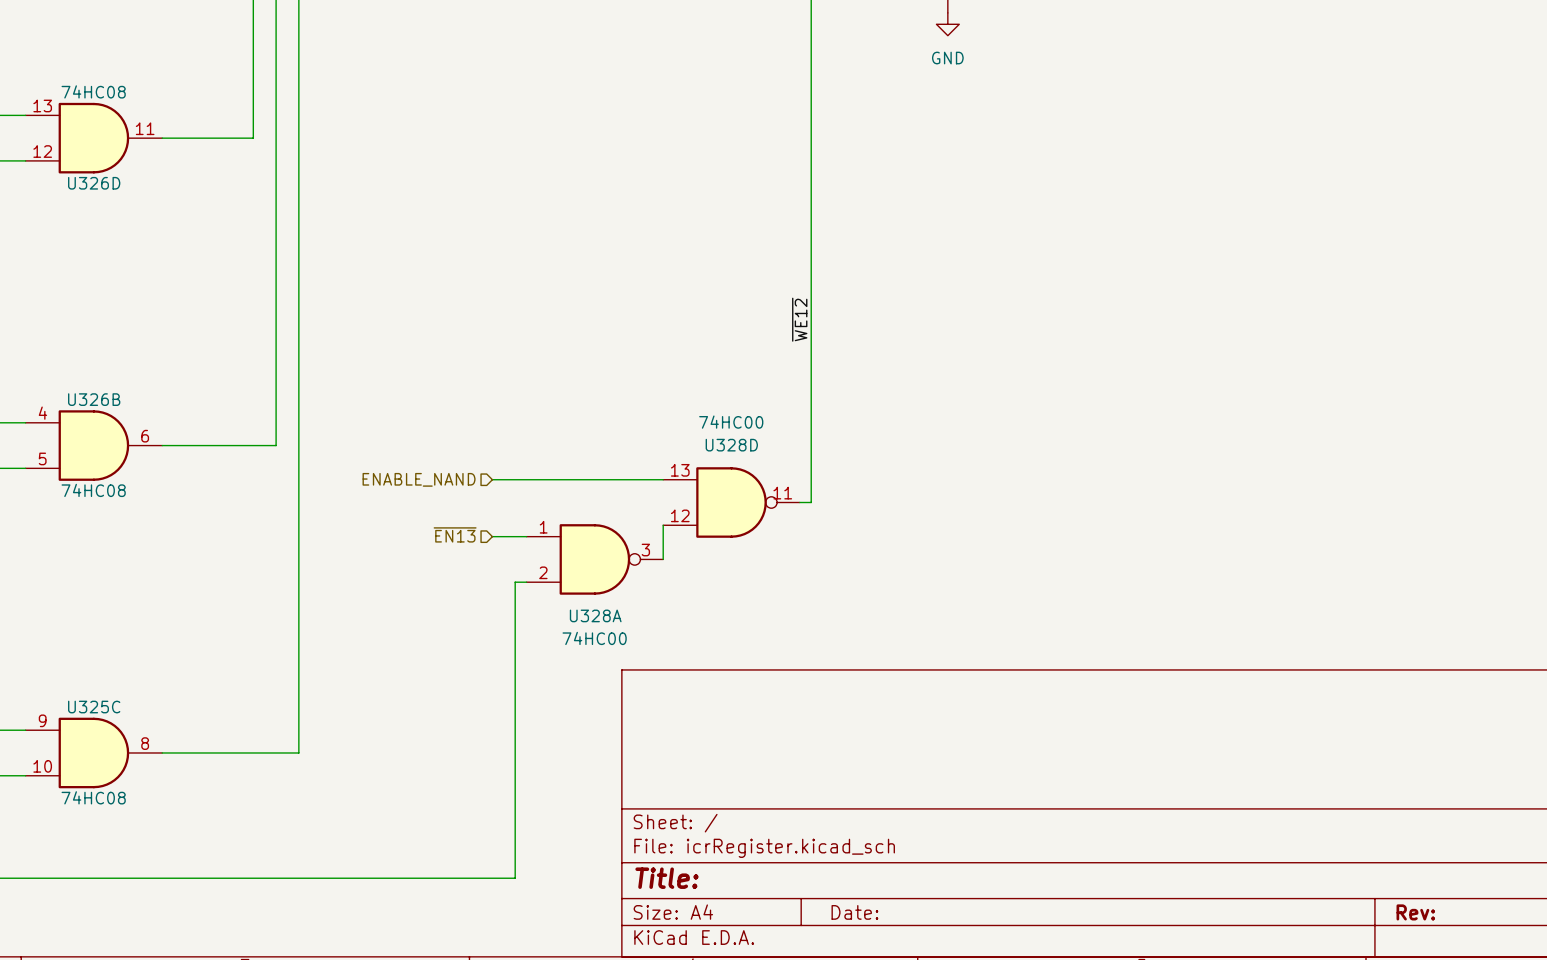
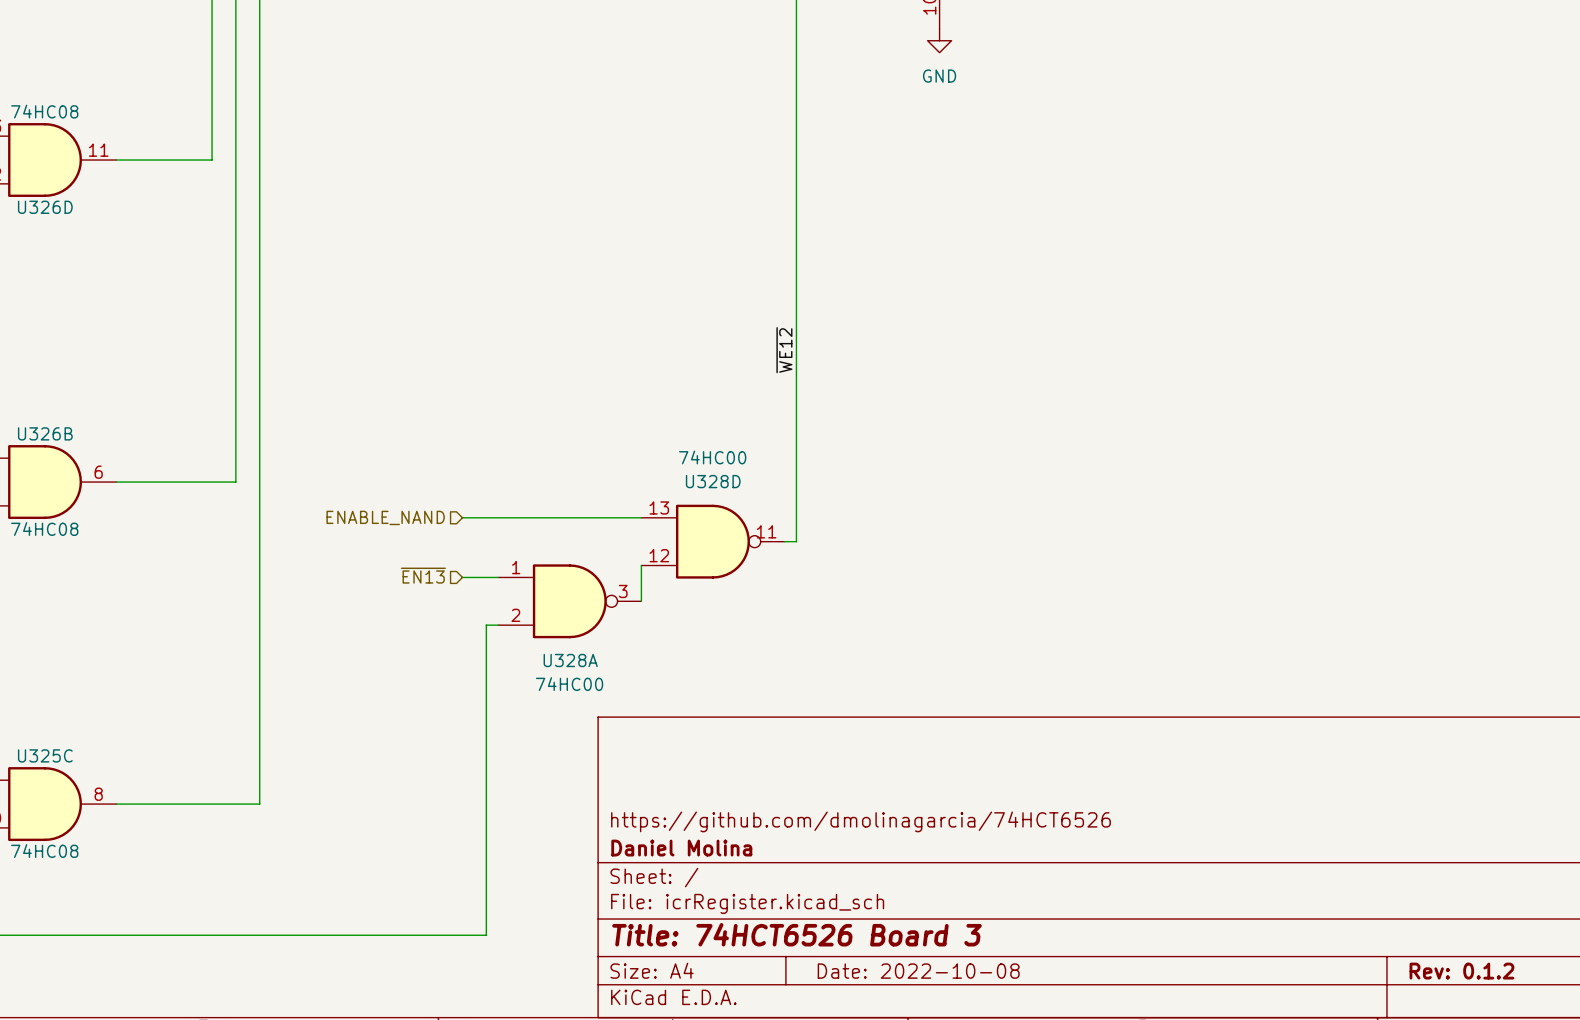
title block: none -> https://github.com/dmolinagarcia/74HCT6526 (860, 821)
title block: none -> Daniel Molina (681, 848)
title block: Title: (666, 878) -> Title: 74HCT6526 Board 3 (797, 934)
title block: Date: (854, 912) -> Date: 2022-10-08 (918, 971)
title block: Rev: (1415, 912) -> Rev: 0.1.2 (1461, 971)

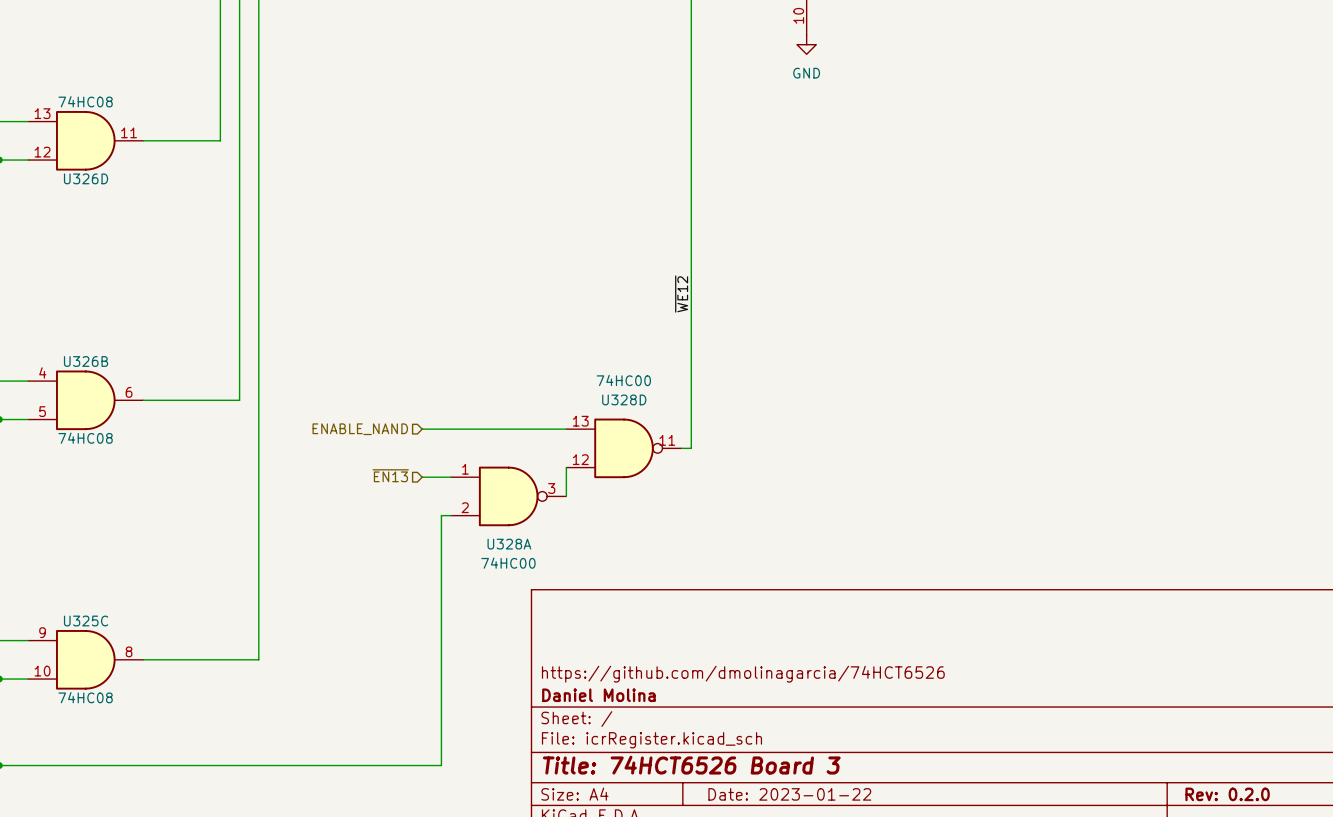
title block: Date: 2022-10-08 (918, 971) -> Date: 2023-01-22 (789, 794)
title block: Rev: 0.1.2 (1461, 971) -> Rev: 0.2.0 (1227, 794)

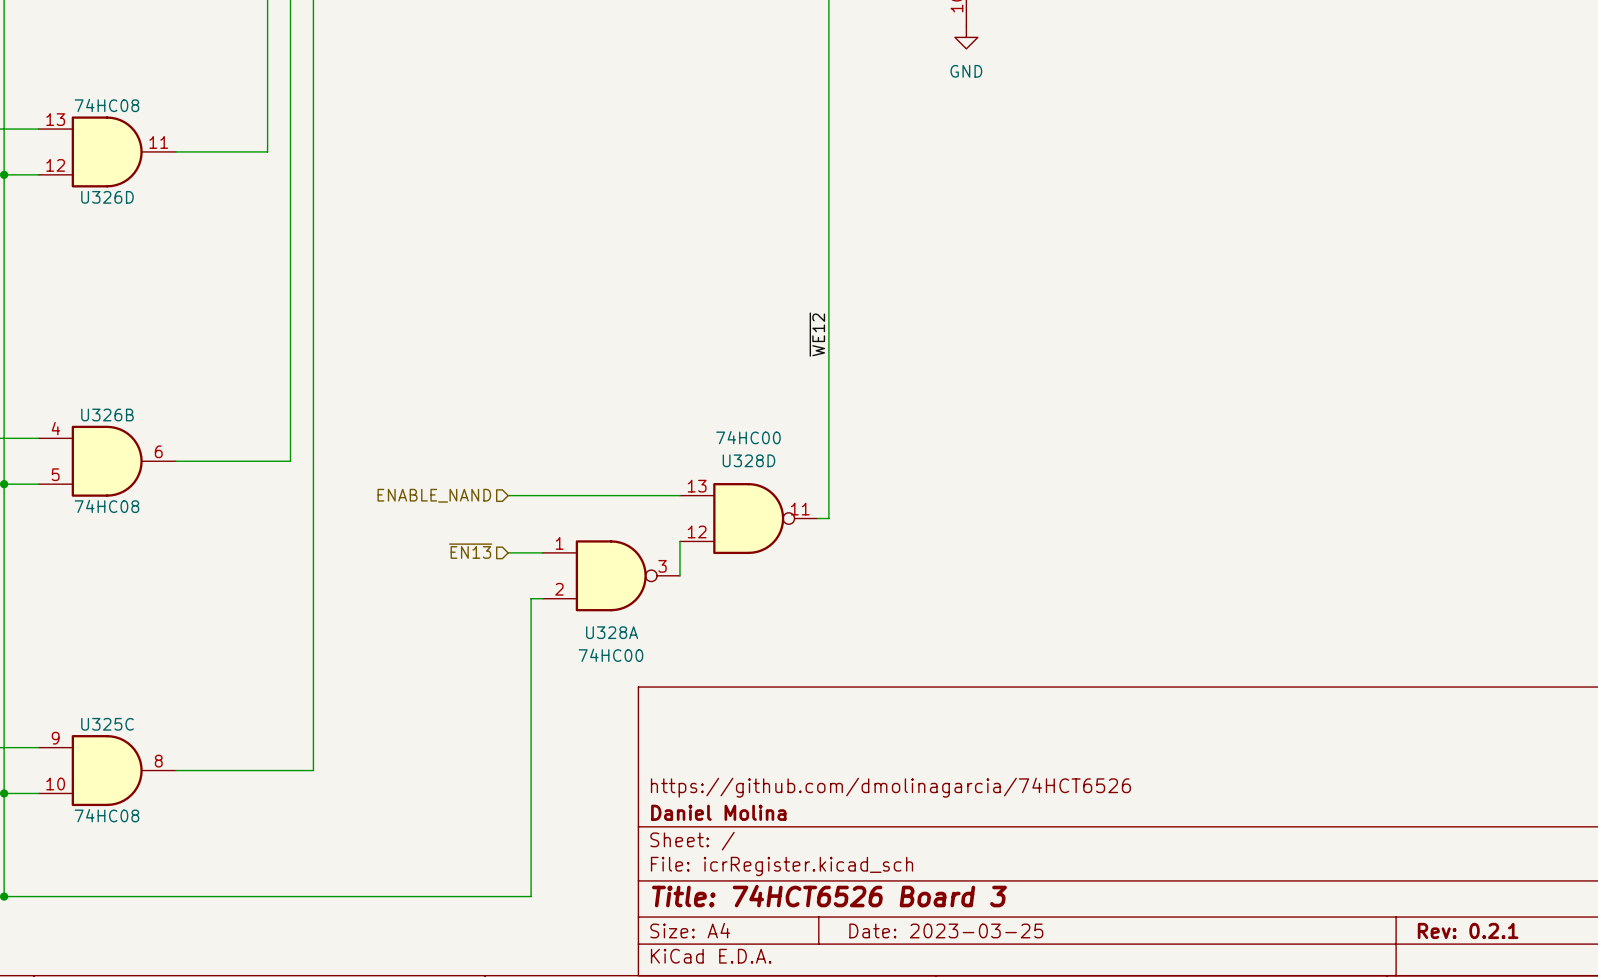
title block: Date: 2023-01-22 (789, 794) -> Date: 2023-03-25 (946, 930)
title block: Rev: 0.2.0 (1227, 794) -> Rev: 0.2.1 (1468, 930)

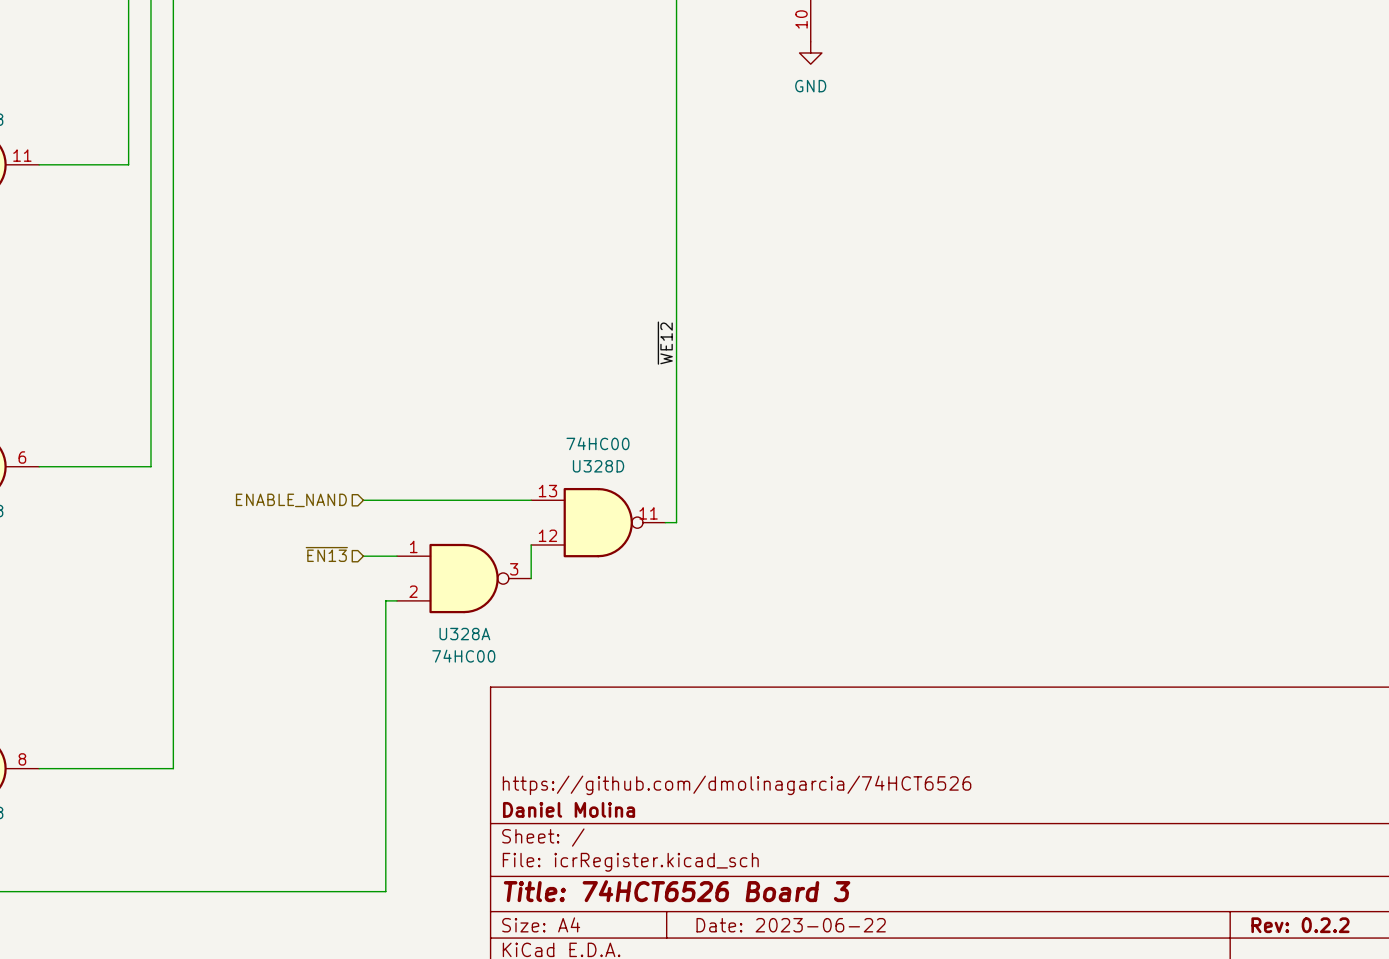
title block: Date: 2023-03-25 (946, 930) -> Date: 2023-06-22 (791, 925)
title block: Rev: 0.2.1 (1468, 930) -> Rev: 0.2.2 (1300, 925)

